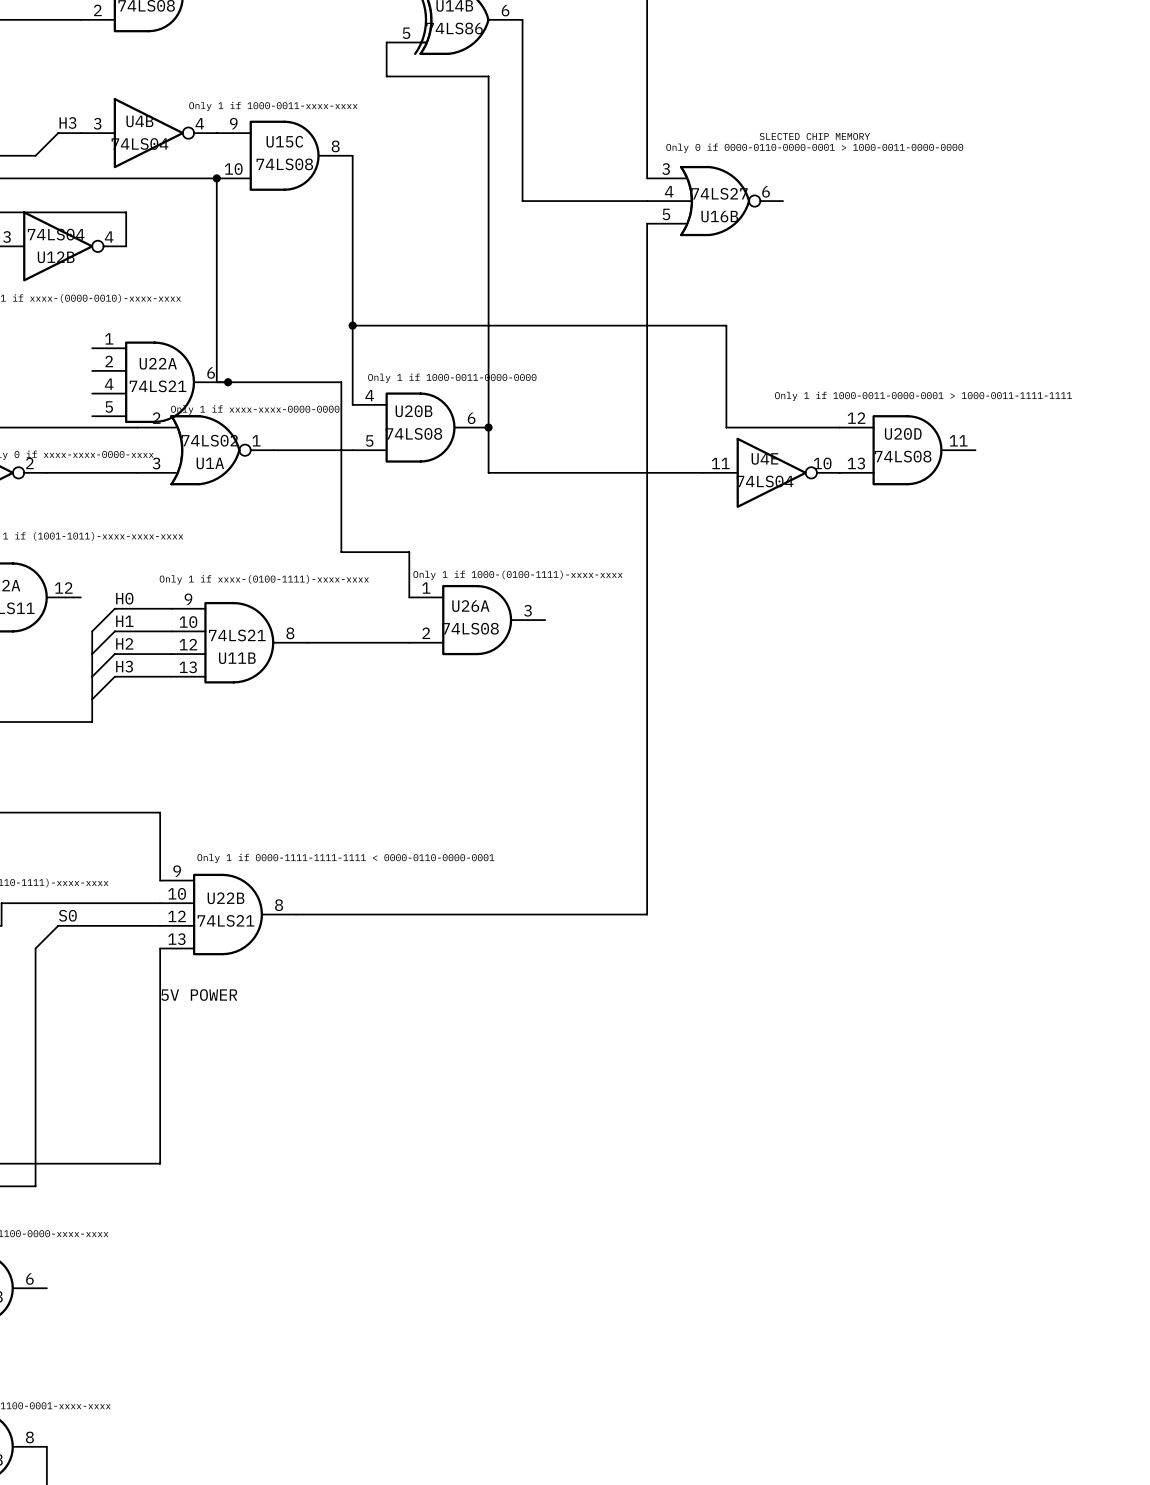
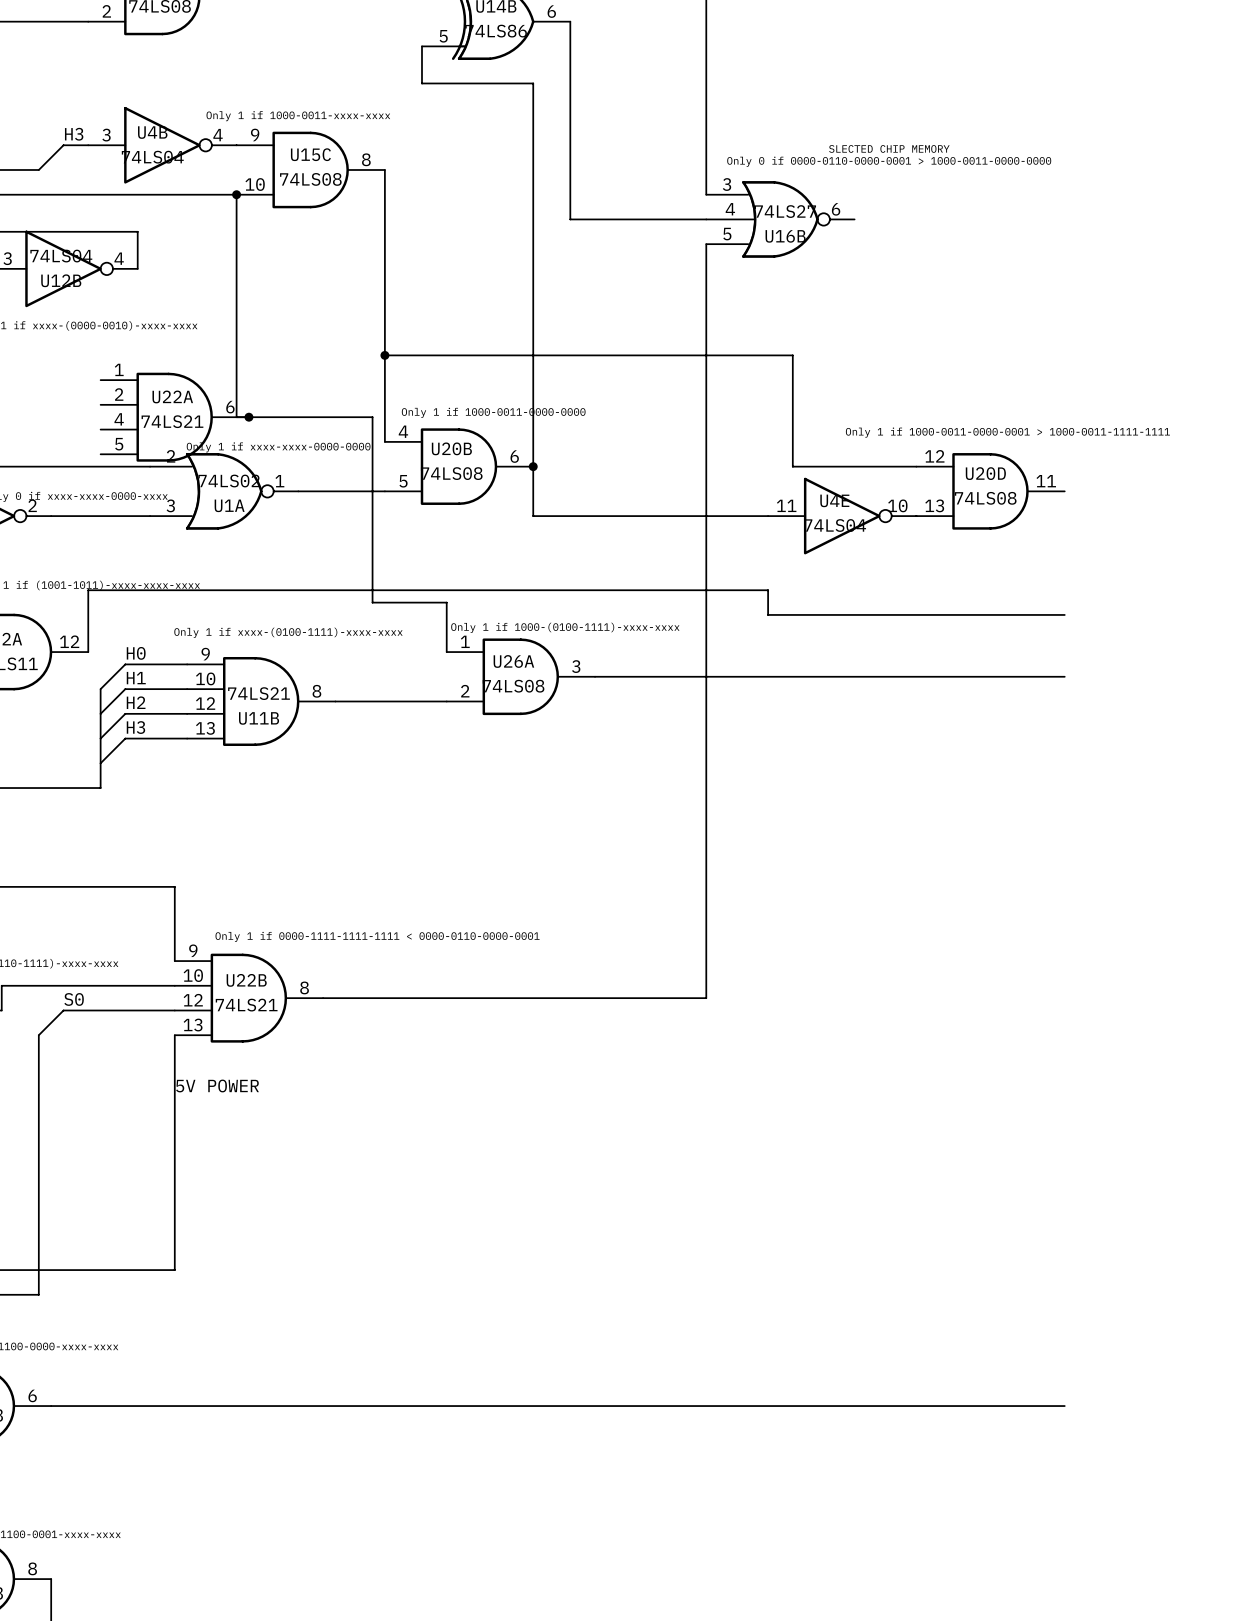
wire: none -> (1064, 614) (768, 614) (768, 590) (88, 590) (88, 652)
wire: none -> (595, 676) (1064, 676)
wire: none -> (51, 1406) (1064, 1406)

